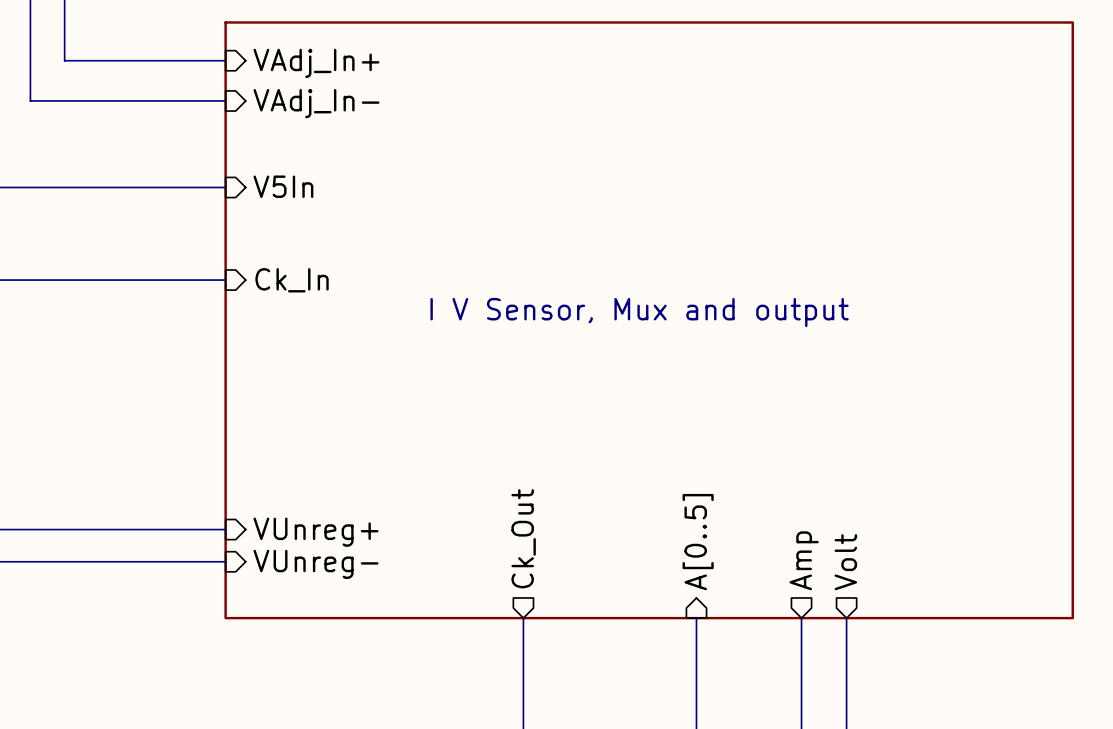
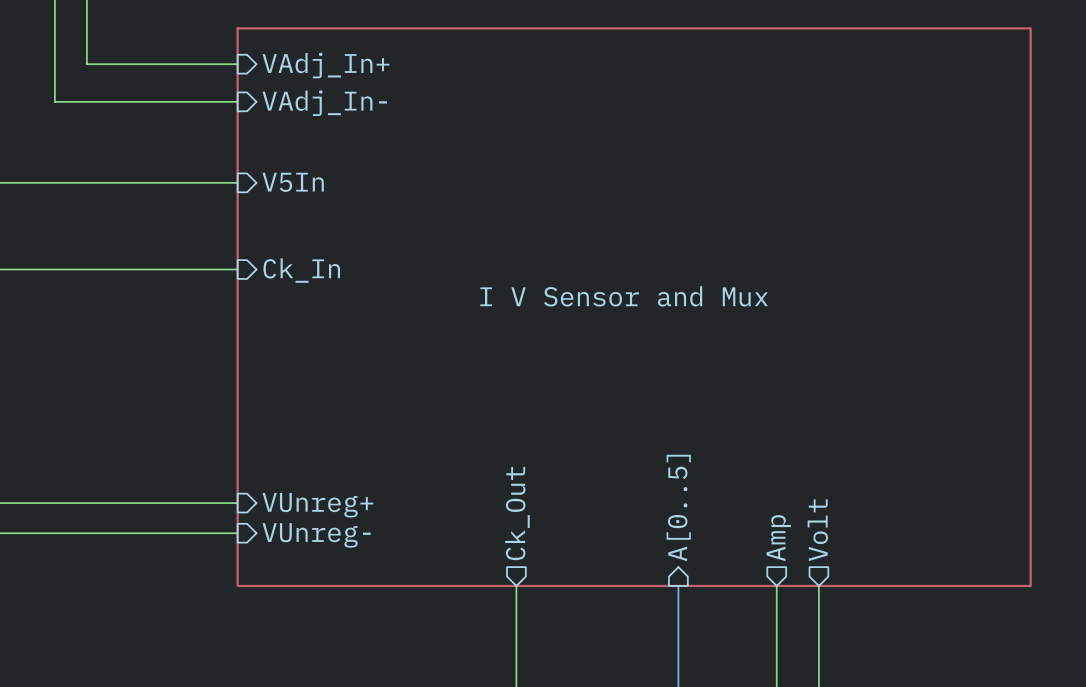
sheet I V Sensor, Mux and output name: I V Sensor, Mux and output (639, 312) -> I V Sensor and Mux (624, 296)

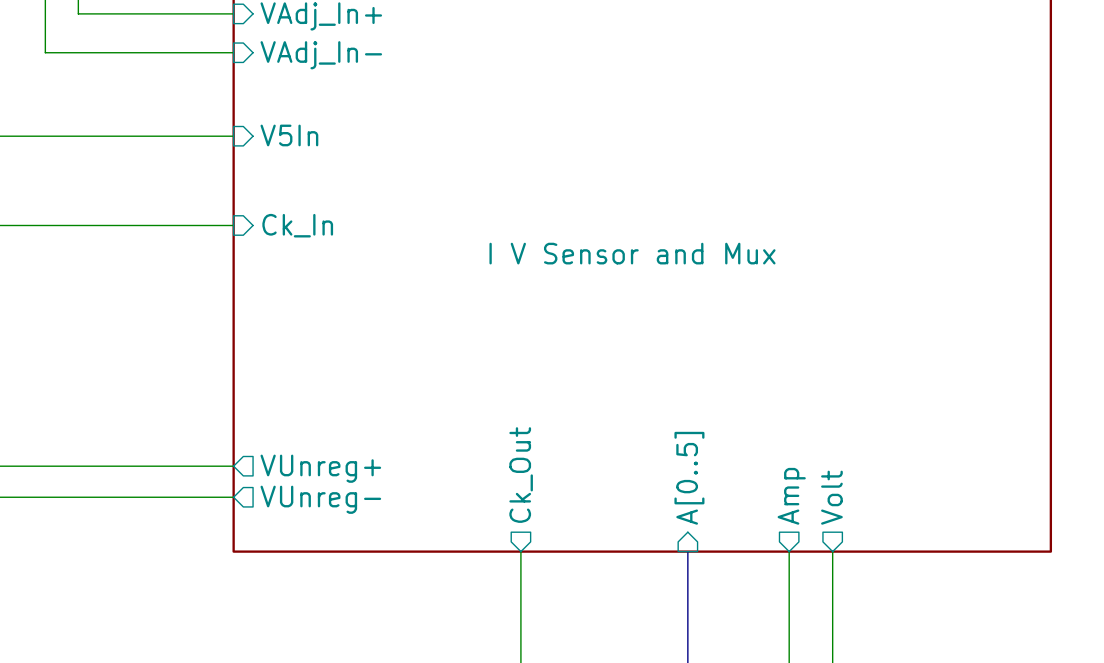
sheet pin shape: input (317, 505) -> output (320, 468)
sheet pin shape: input (316, 535) -> output (320, 499)

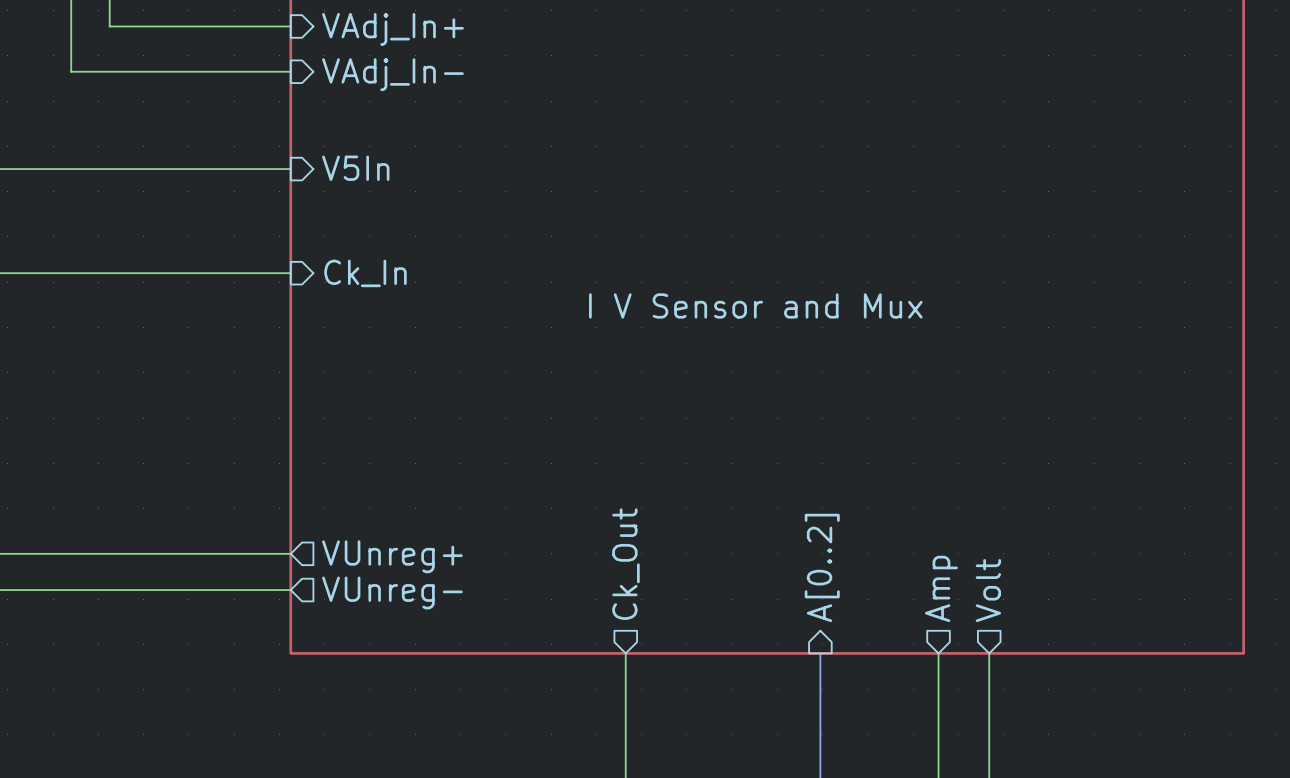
sheet pin: A[0..5] (689, 478) -> A[0..2] (822, 567)

